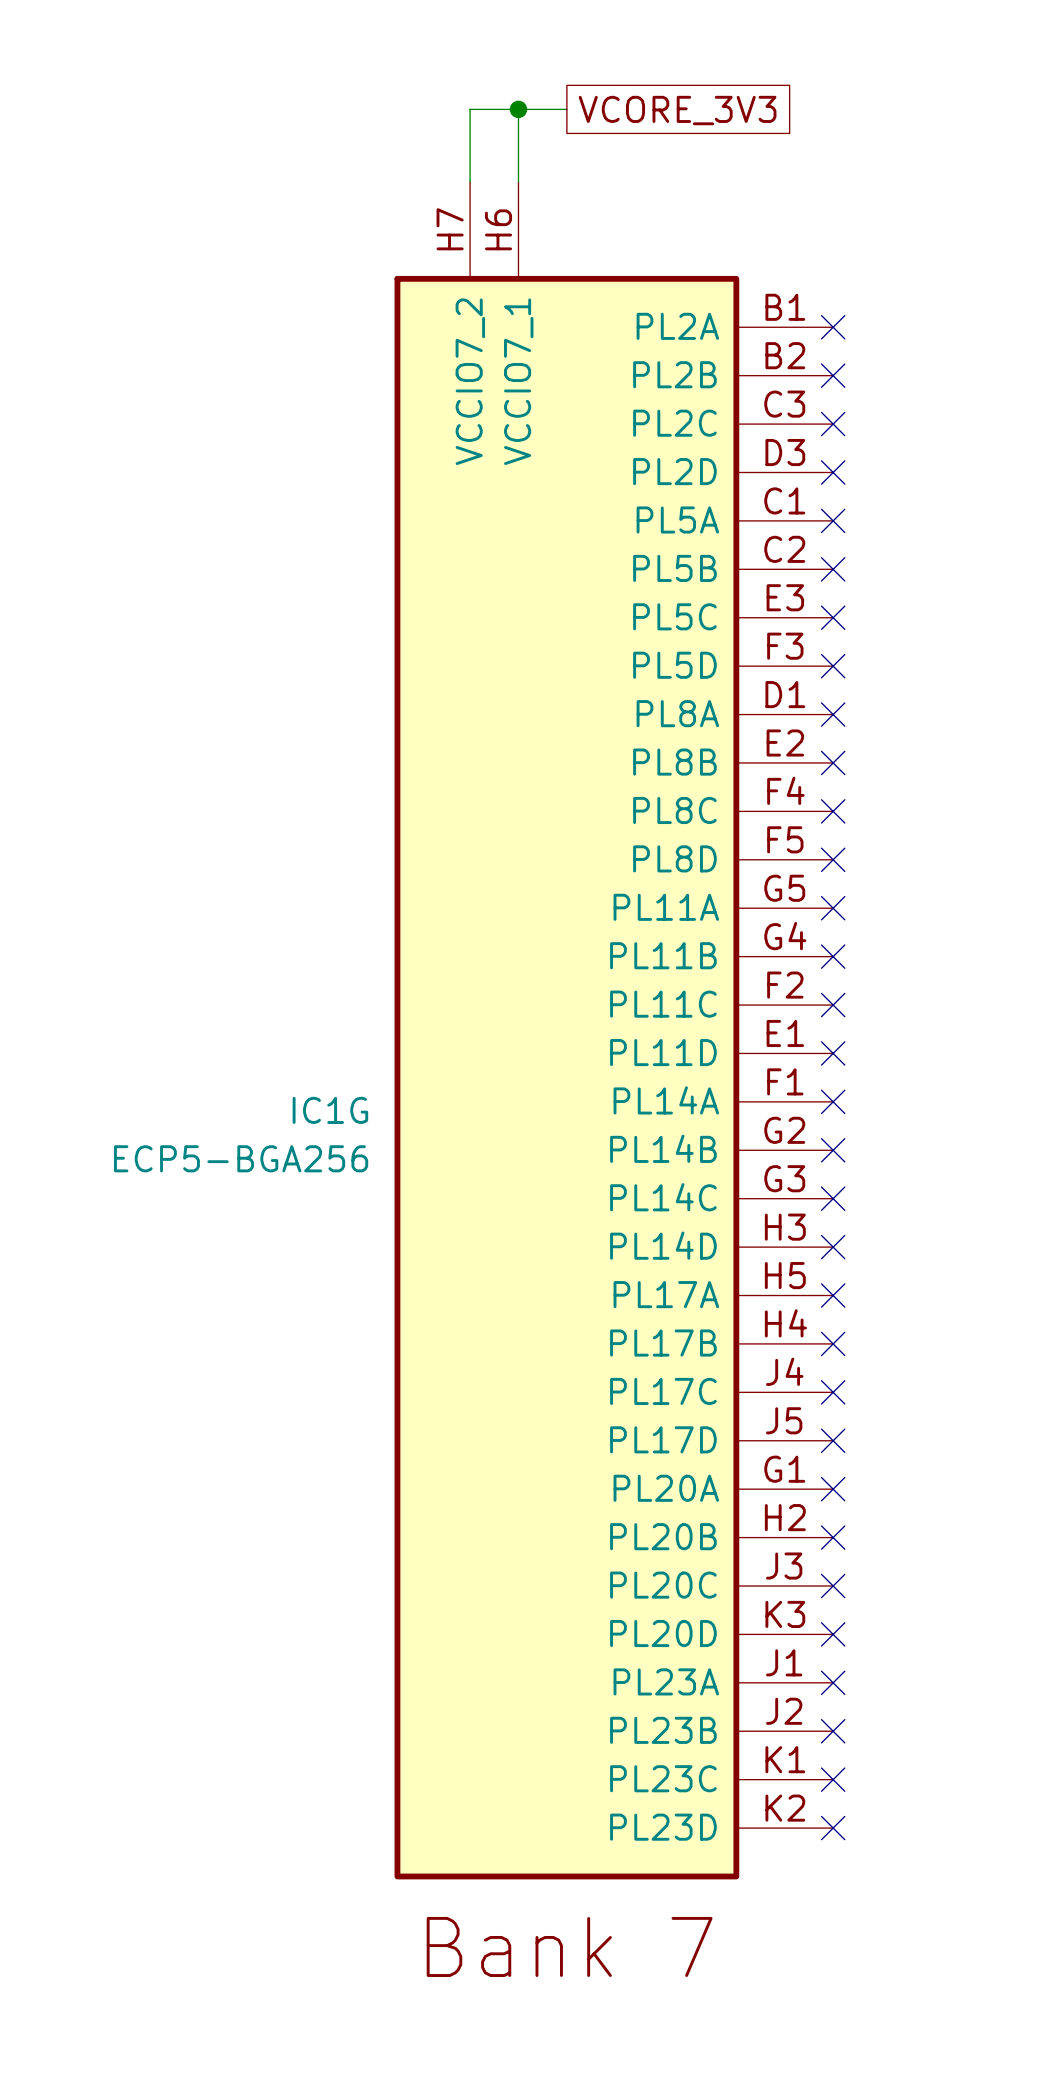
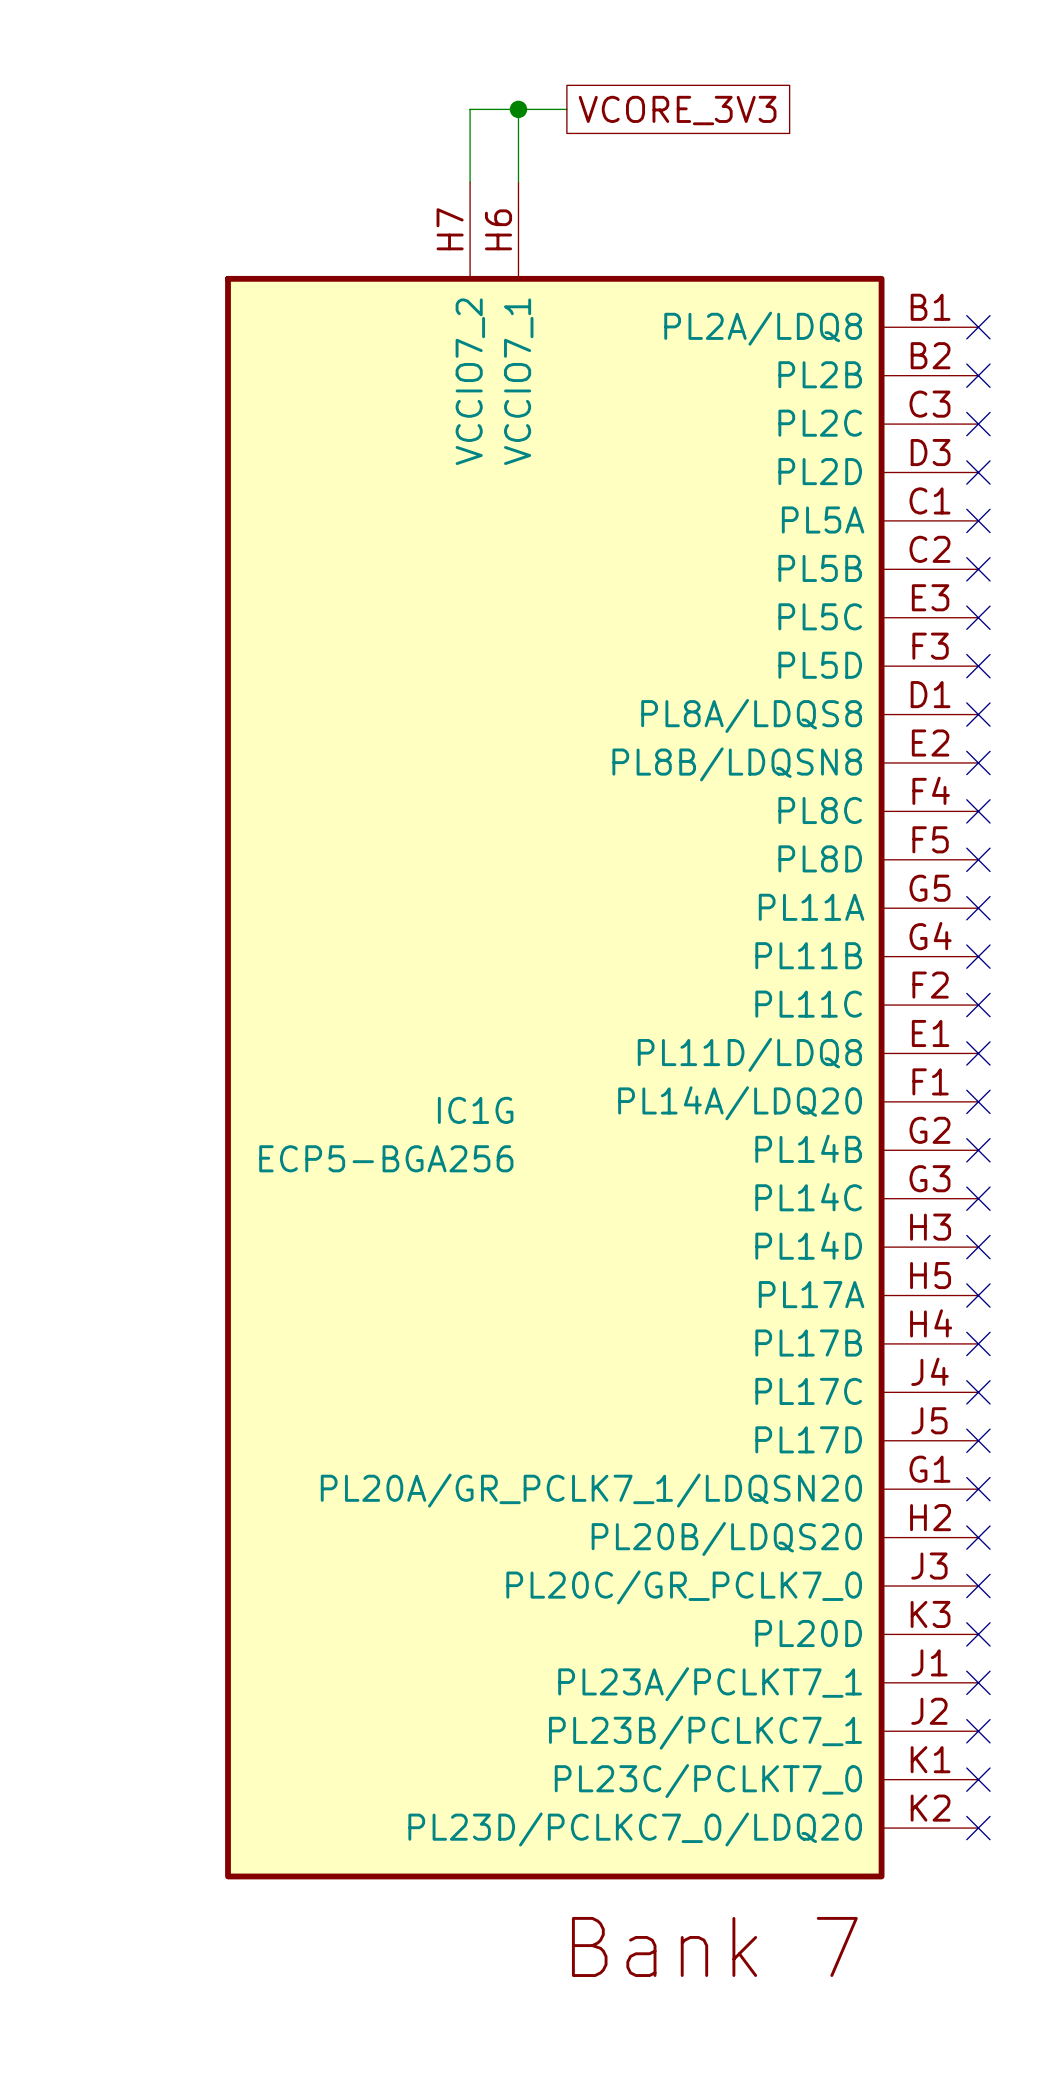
IC1G symbol: [394, 182, 834, 1880] -> [225, 182, 979, 1880]
no-connect mark: (833, 327) -> none
no-connect mark: none -> (978, 327)
no-connect mark: (833, 375) -> none
no-connect mark: none -> (978, 375)
no-connect mark: (833, 424) -> none
no-connect mark: none -> (978, 424)
no-connect mark: (833, 472) -> none
no-connect mark: none -> (978, 472)
no-connect mark: (833, 520) -> none
no-connect mark: none -> (978, 520)
no-connect mark: (833, 569) -> none
no-connect mark: none -> (978, 569)
no-connect mark: (833, 617) -> none
no-connect mark: none -> (978, 617)
no-connect mark: (833, 666) -> none
no-connect mark: none -> (978, 666)
no-connect mark: (833, 714) -> none
no-connect mark: none -> (978, 714)
no-connect mark: (833, 762) -> none
no-connect mark: none -> (978, 762)
no-connect mark: (833, 811) -> none
no-connect mark: none -> (978, 811)
no-connect mark: (833, 859) -> none
no-connect mark: none -> (978, 859)
no-connect mark: (833, 908) -> none
no-connect mark: none -> (978, 908)
no-connect mark: (833, 956) -> none
no-connect mark: none -> (978, 956)
no-connect mark: (833, 1005) -> none
no-connect mark: none -> (978, 1005)
no-connect mark: (833, 1053) -> none
no-connect mark: none -> (978, 1053)
no-connect mark: (833, 1101) -> none
no-connect mark: none -> (978, 1101)
IC1G name position: IC1G (330, 1110) -> IC1G (475, 1110)
no-connect mark: (833, 1150) -> none
no-connect mark: none -> (978, 1150)
IC1G value position: ECP5-BGA256 (241, 1158) -> ECP5-BGA256 (386, 1158)
no-connect mark: (833, 1198) -> none
no-connect mark: none -> (978, 1198)
no-connect mark: (833, 1247) -> none
no-connect mark: none -> (978, 1247)
no-connect mark: (833, 1295) -> none
no-connect mark: none -> (978, 1295)
no-connect mark: (833, 1343) -> none
no-connect mark: none -> (978, 1343)
no-connect mark: (833, 1392) -> none
no-connect mark: none -> (978, 1392)
no-connect mark: (833, 1440) -> none
no-connect mark: none -> (978, 1440)
no-connect mark: (833, 1489) -> none
no-connect mark: none -> (978, 1489)
no-connect mark: (833, 1537) -> none
no-connect mark: none -> (978, 1537)
no-connect mark: (833, 1586) -> none
no-connect mark: none -> (978, 1586)
no-connect mark: (833, 1634) -> none
no-connect mark: none -> (978, 1634)
no-connect mark: (833, 1682) -> none
no-connect mark: none -> (978, 1682)
no-connect mark: (833, 1731) -> none
no-connect mark: none -> (978, 1731)
no-connect mark: (833, 1779) -> none
no-connect mark: none -> (978, 1779)
no-connect mark: (833, 1828) -> none
no-connect mark: none -> (978, 1828)

